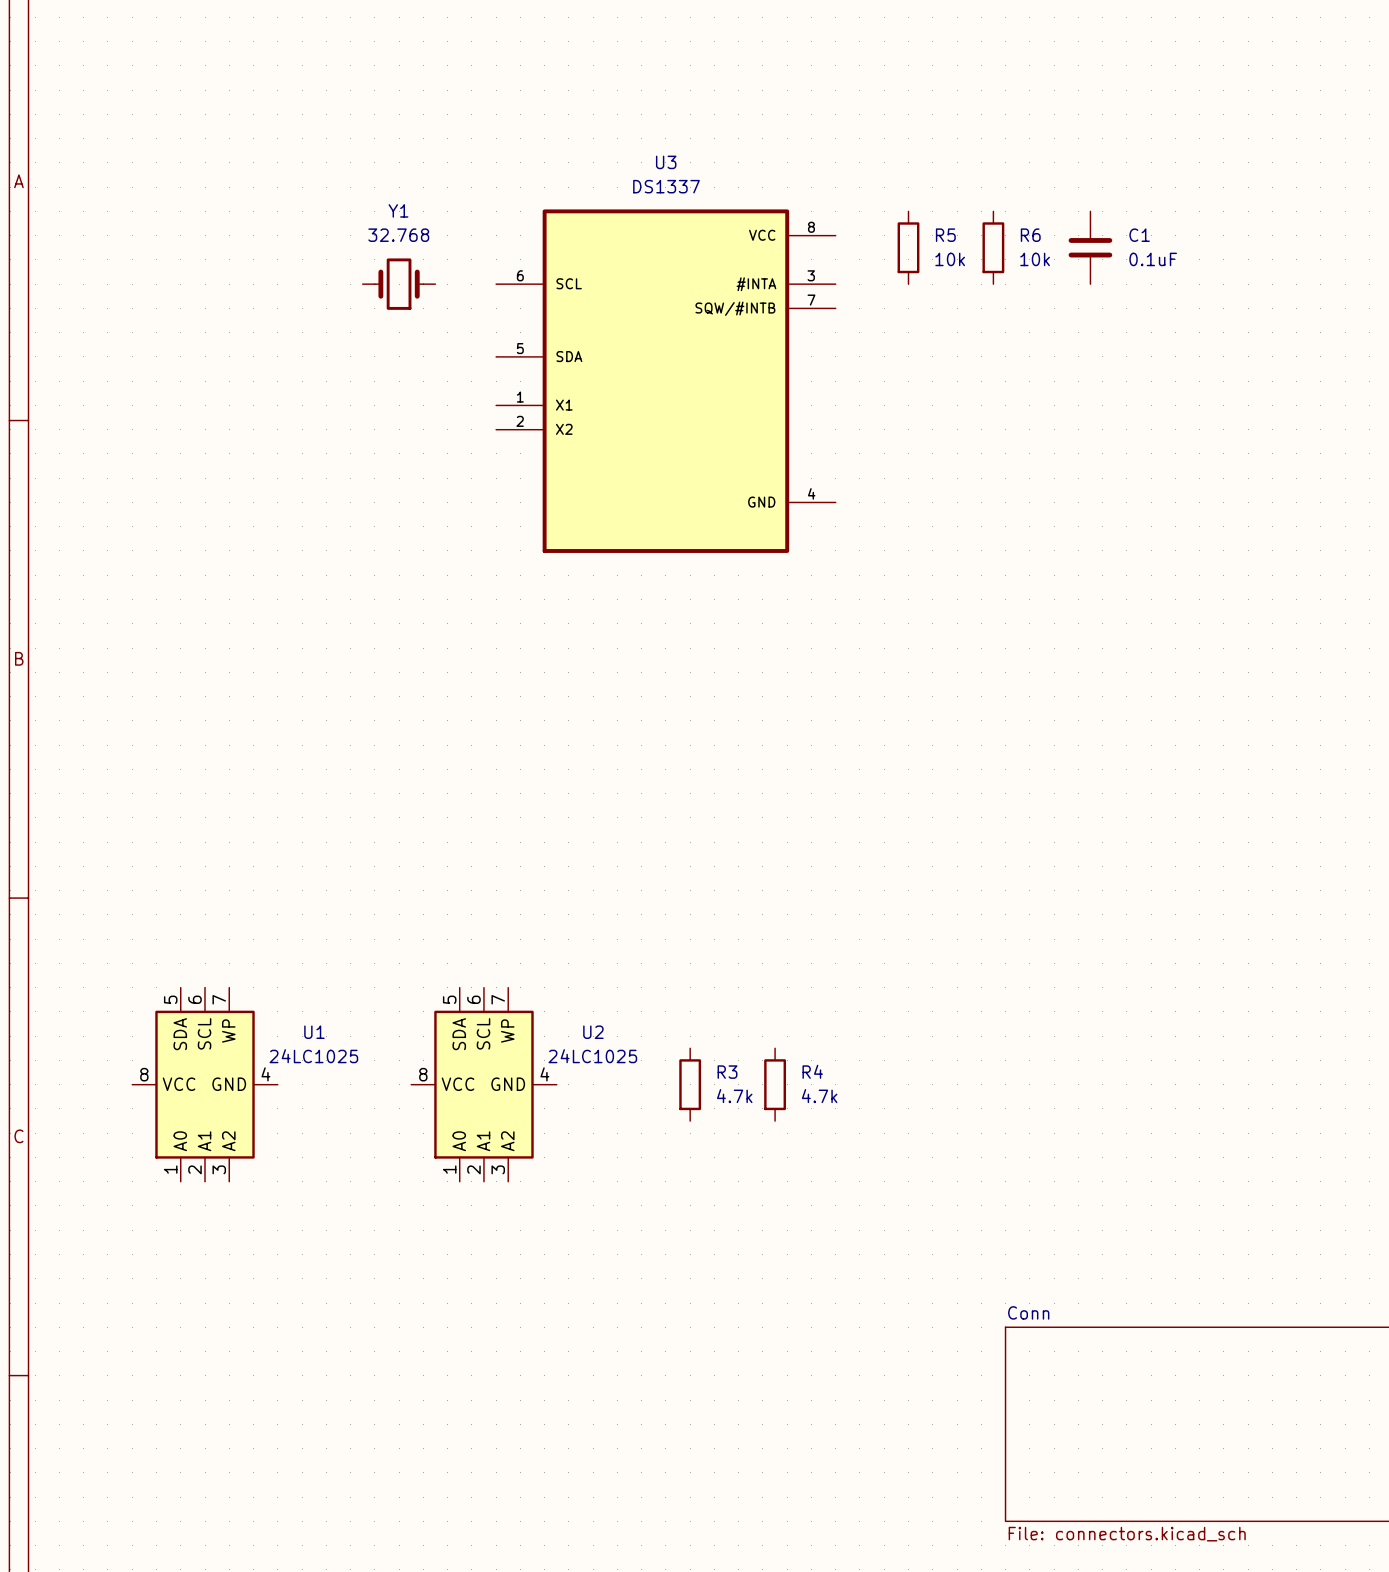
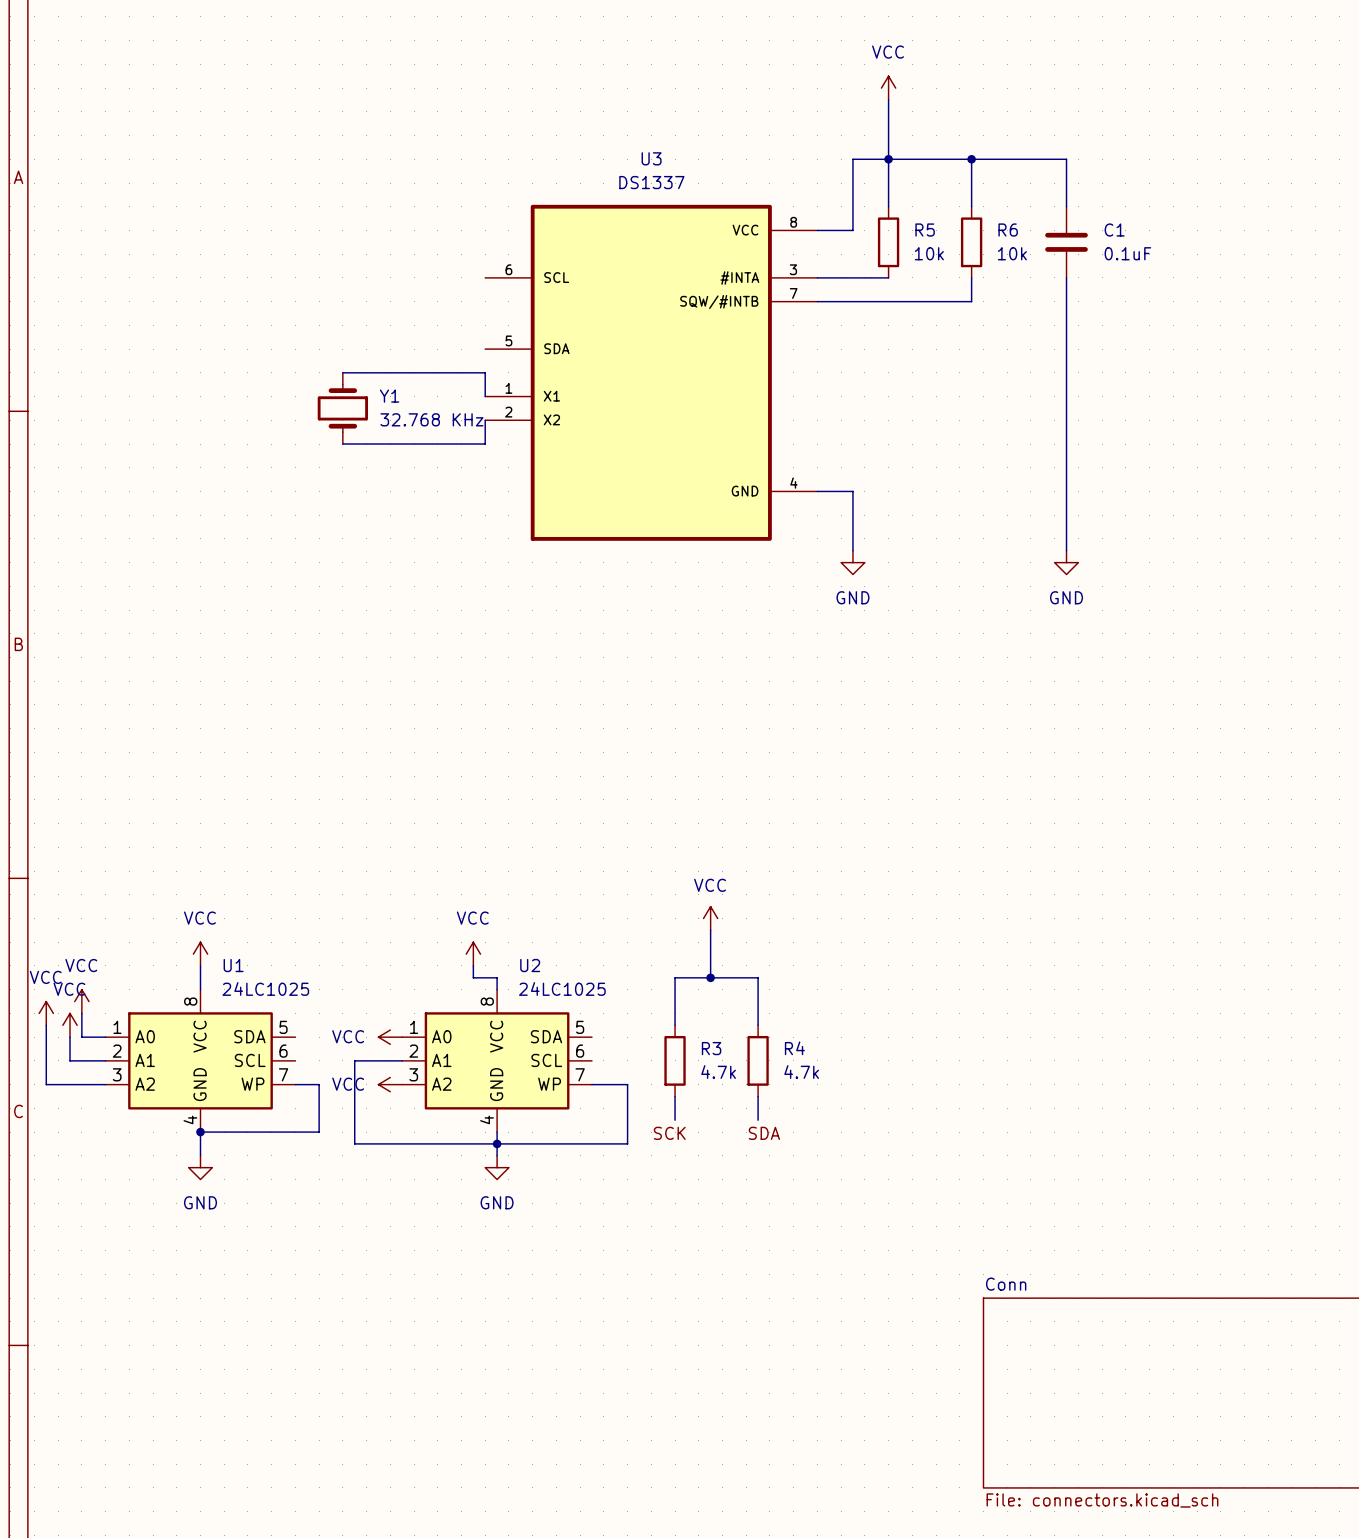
power symbol: none -> VCC (888, 88)
wire: none -> (888, 99) (888, 206)
junction: none -> (888, 159)
wire: none -> (971, 159) (971, 206)
junction: none -> (971, 159)
Y1 name position: Y1 (398, 210) -> Y1 (389, 396)
wire: none -> (1066, 206) (1066, 159) (852, 159) (852, 230) (817, 230)
Y1 value: 32.768 (398, 235) -> 32.768 KHz (431, 419)
Y1 rotation: 0° (399, 284) -> 90° clockwise (342, 408)
Y1 position: (399, 284) -> (342, 408)
wire: none -> (817, 277) (888, 277)
wire: none -> (971, 277) (971, 301) (817, 301)
wire: none -> (1066, 277) (1066, 550)
wire: none -> (342, 372) (485, 372) (485, 396)
wire: none -> (485, 420) (485, 444) (342, 444)
wire: none -> (817, 491) (852, 491) (852, 550)
power symbol: none -> GND (852, 562)
power symbol: none -> GND (1066, 562)
power symbol: none -> VCC (710, 918)
wire: none -> (710, 930) (710, 977)
power symbol: none -> VCC (200, 954)
power symbol: none -> VCC (473, 954)
junction: none -> (710, 977)
power symbol: none -> VCC (81, 1001)
U1 name position: U1 (314, 1032) -> U1 (233, 965)
U2 name position: U2 (593, 1032) -> U2 (530, 965)
power symbol: none -> VCC (46, 1013)
wire: none -> (81, 1013) (81, 1037) (105, 1037)
wire: none -> (46, 1025) (46, 1084) (105, 1084)
power symbol: none -> VCC (70, 1025)
wire: none -> (675, 1025) (675, 977) (758, 977) (758, 1025)
U1 value position: 24LC1025 (313, 1056) -> 24LC1025 (265, 988)
U2 value position: 24LC1025 (592, 1056) -> 24LC1025 (562, 988)
wire: none -> (70, 1037) (70, 1060) (105, 1060)
power symbol: none -> VCC (390, 1037)
U1 rotation: 0° (205, 1084) -> 90° clockwise (200, 1060)
wire: none -> (402, 1060) (354, 1060) (354, 1143) (627, 1143) (627, 1084) (591, 1084)
U2 rotation: 0° (483, 1084) -> 90° clockwise (497, 1060)
wire: none -> (295, 1084) (319, 1084) (319, 1132) (200, 1132) (200, 1155)
power symbol: none -> VCC (390, 1084)
wire: none -> (675, 1096) (675, 1120)
wire: none -> (758, 1096) (758, 1120)
junction: none -> (200, 1132)
label: none -> SCK (669, 1133)
label: none -> SDA (764, 1133)
junction: none -> (497, 1143)
power symbol: none -> GND (200, 1167)
power symbol: none -> GND (497, 1167)

